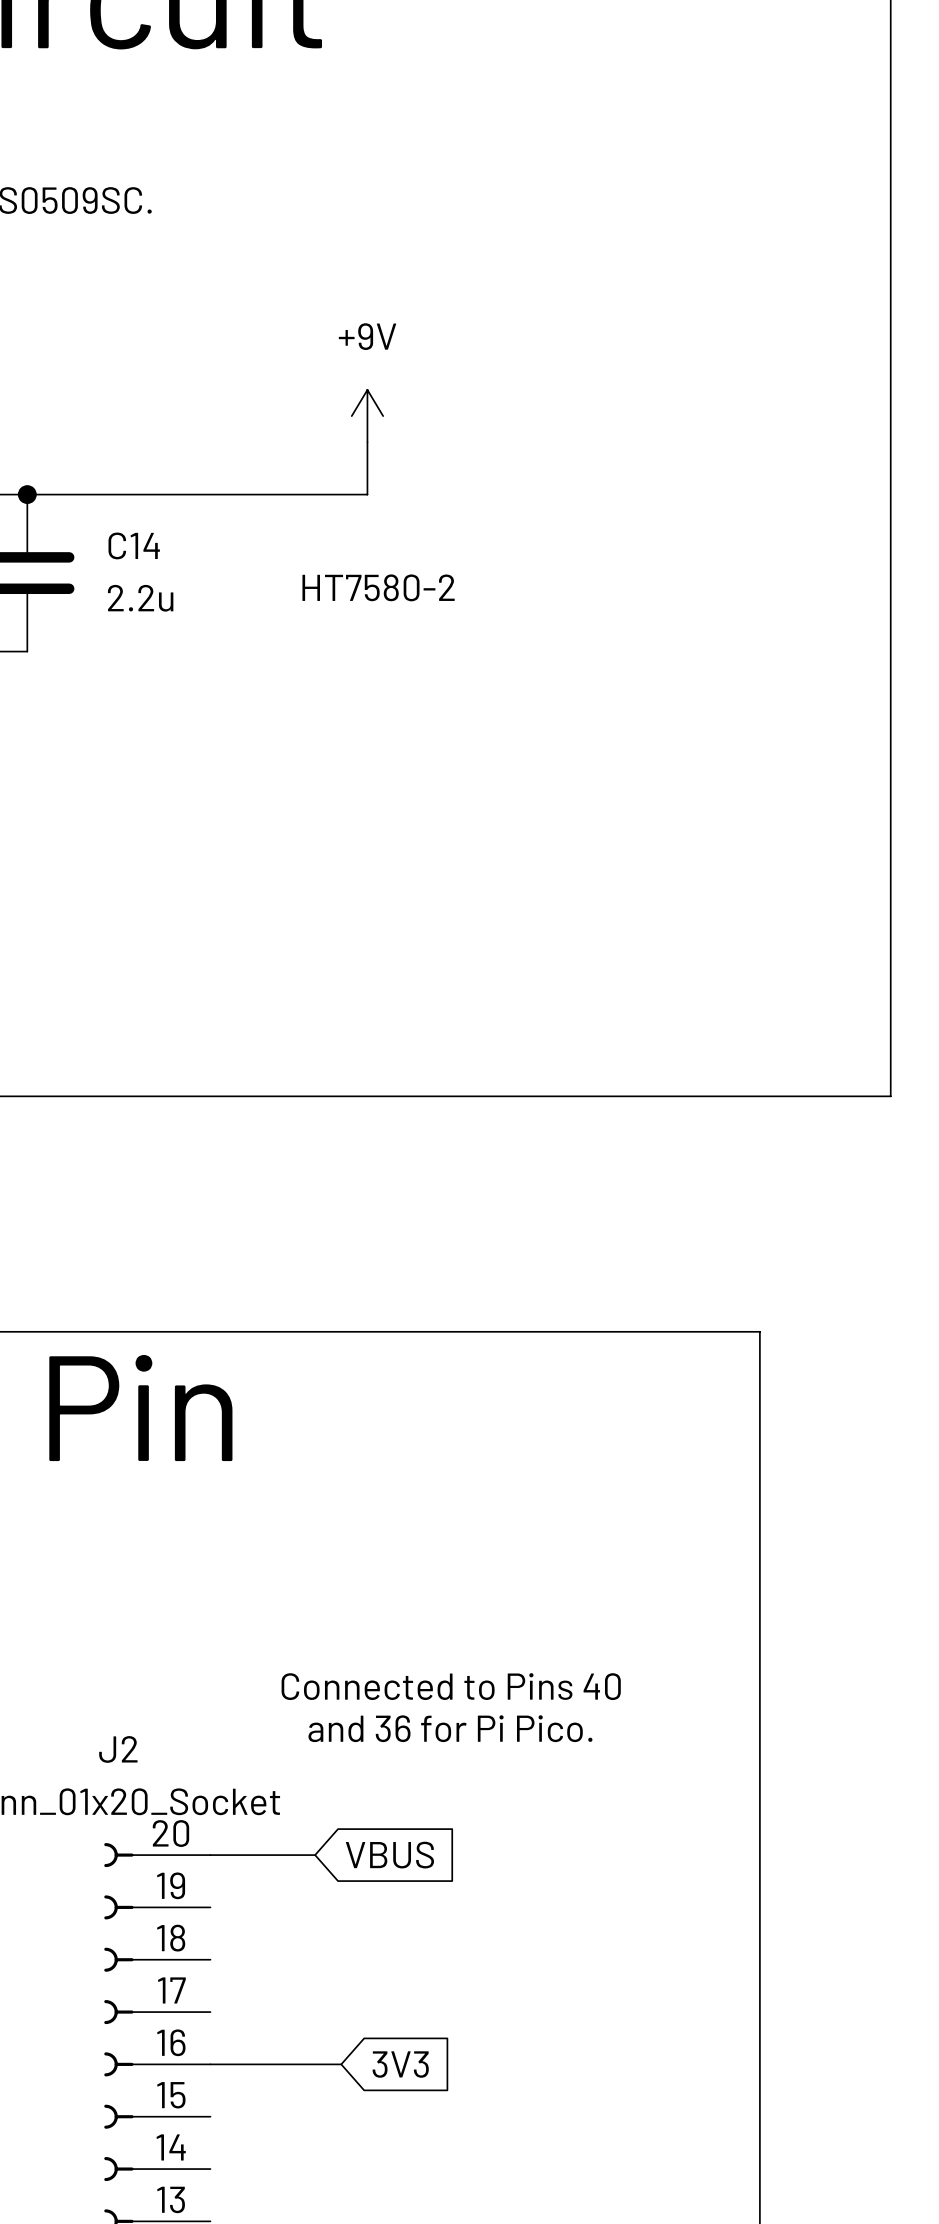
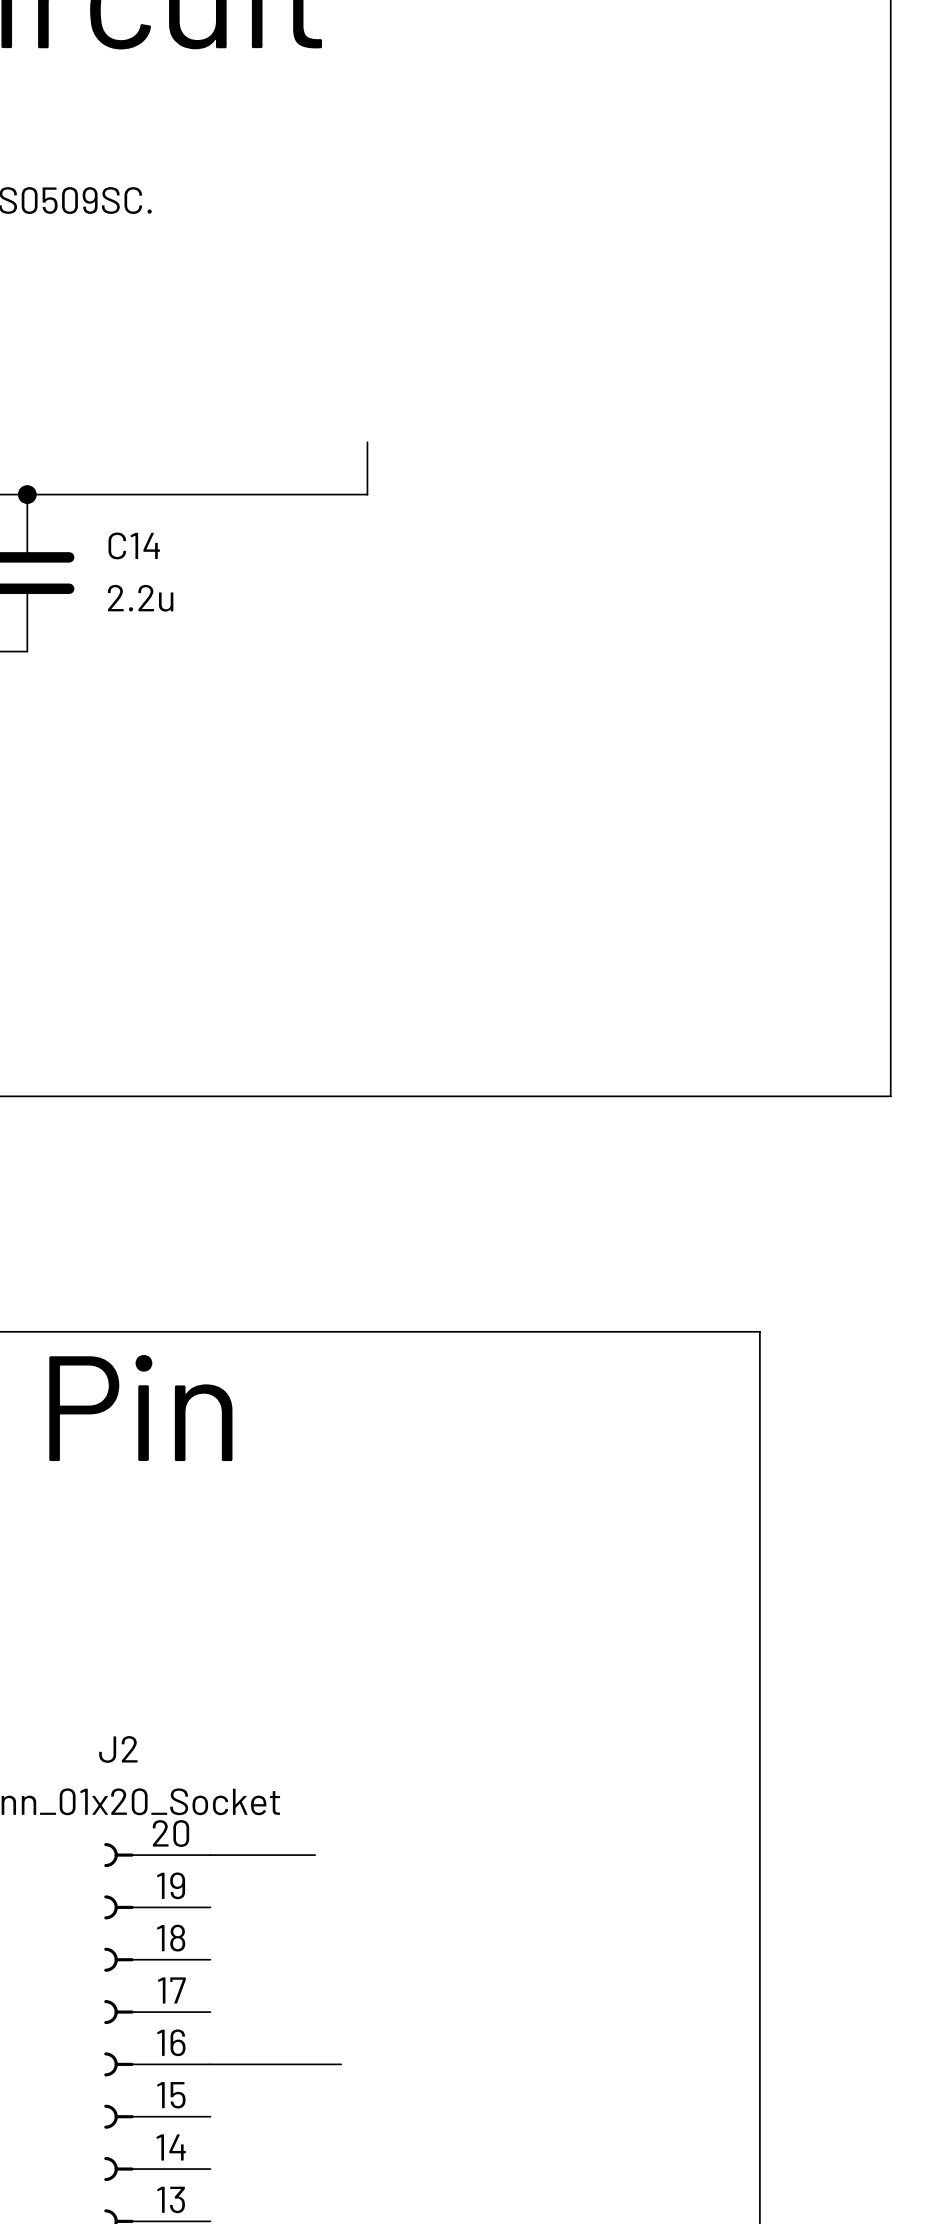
power symbol: +9V (367, 416) -> none
text: HT7580-2 (378, 587) -> none
text: Connected to Pins 40 (451, 1686) -> none
text: and 36 for Pi Pico. (450, 1728) -> none
global label: VBUS (389, 1855) -> none
global label: 3V3 (400, 2064) -> none

